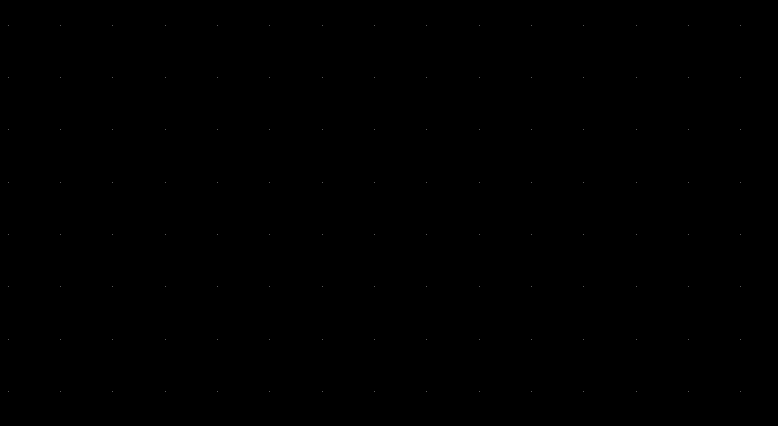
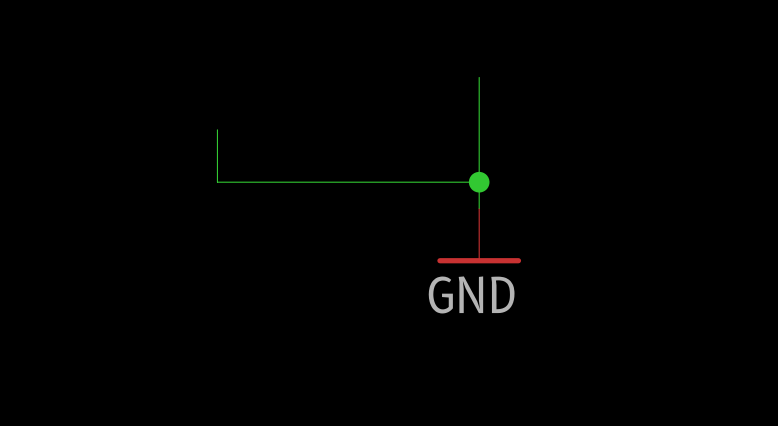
wire: none -> (479, 77) (479, 208)
wire: none -> (217, 129) (217, 182) (479, 182)
junction: none -> (479, 182)
power symbol: none -> GND (479, 235)

